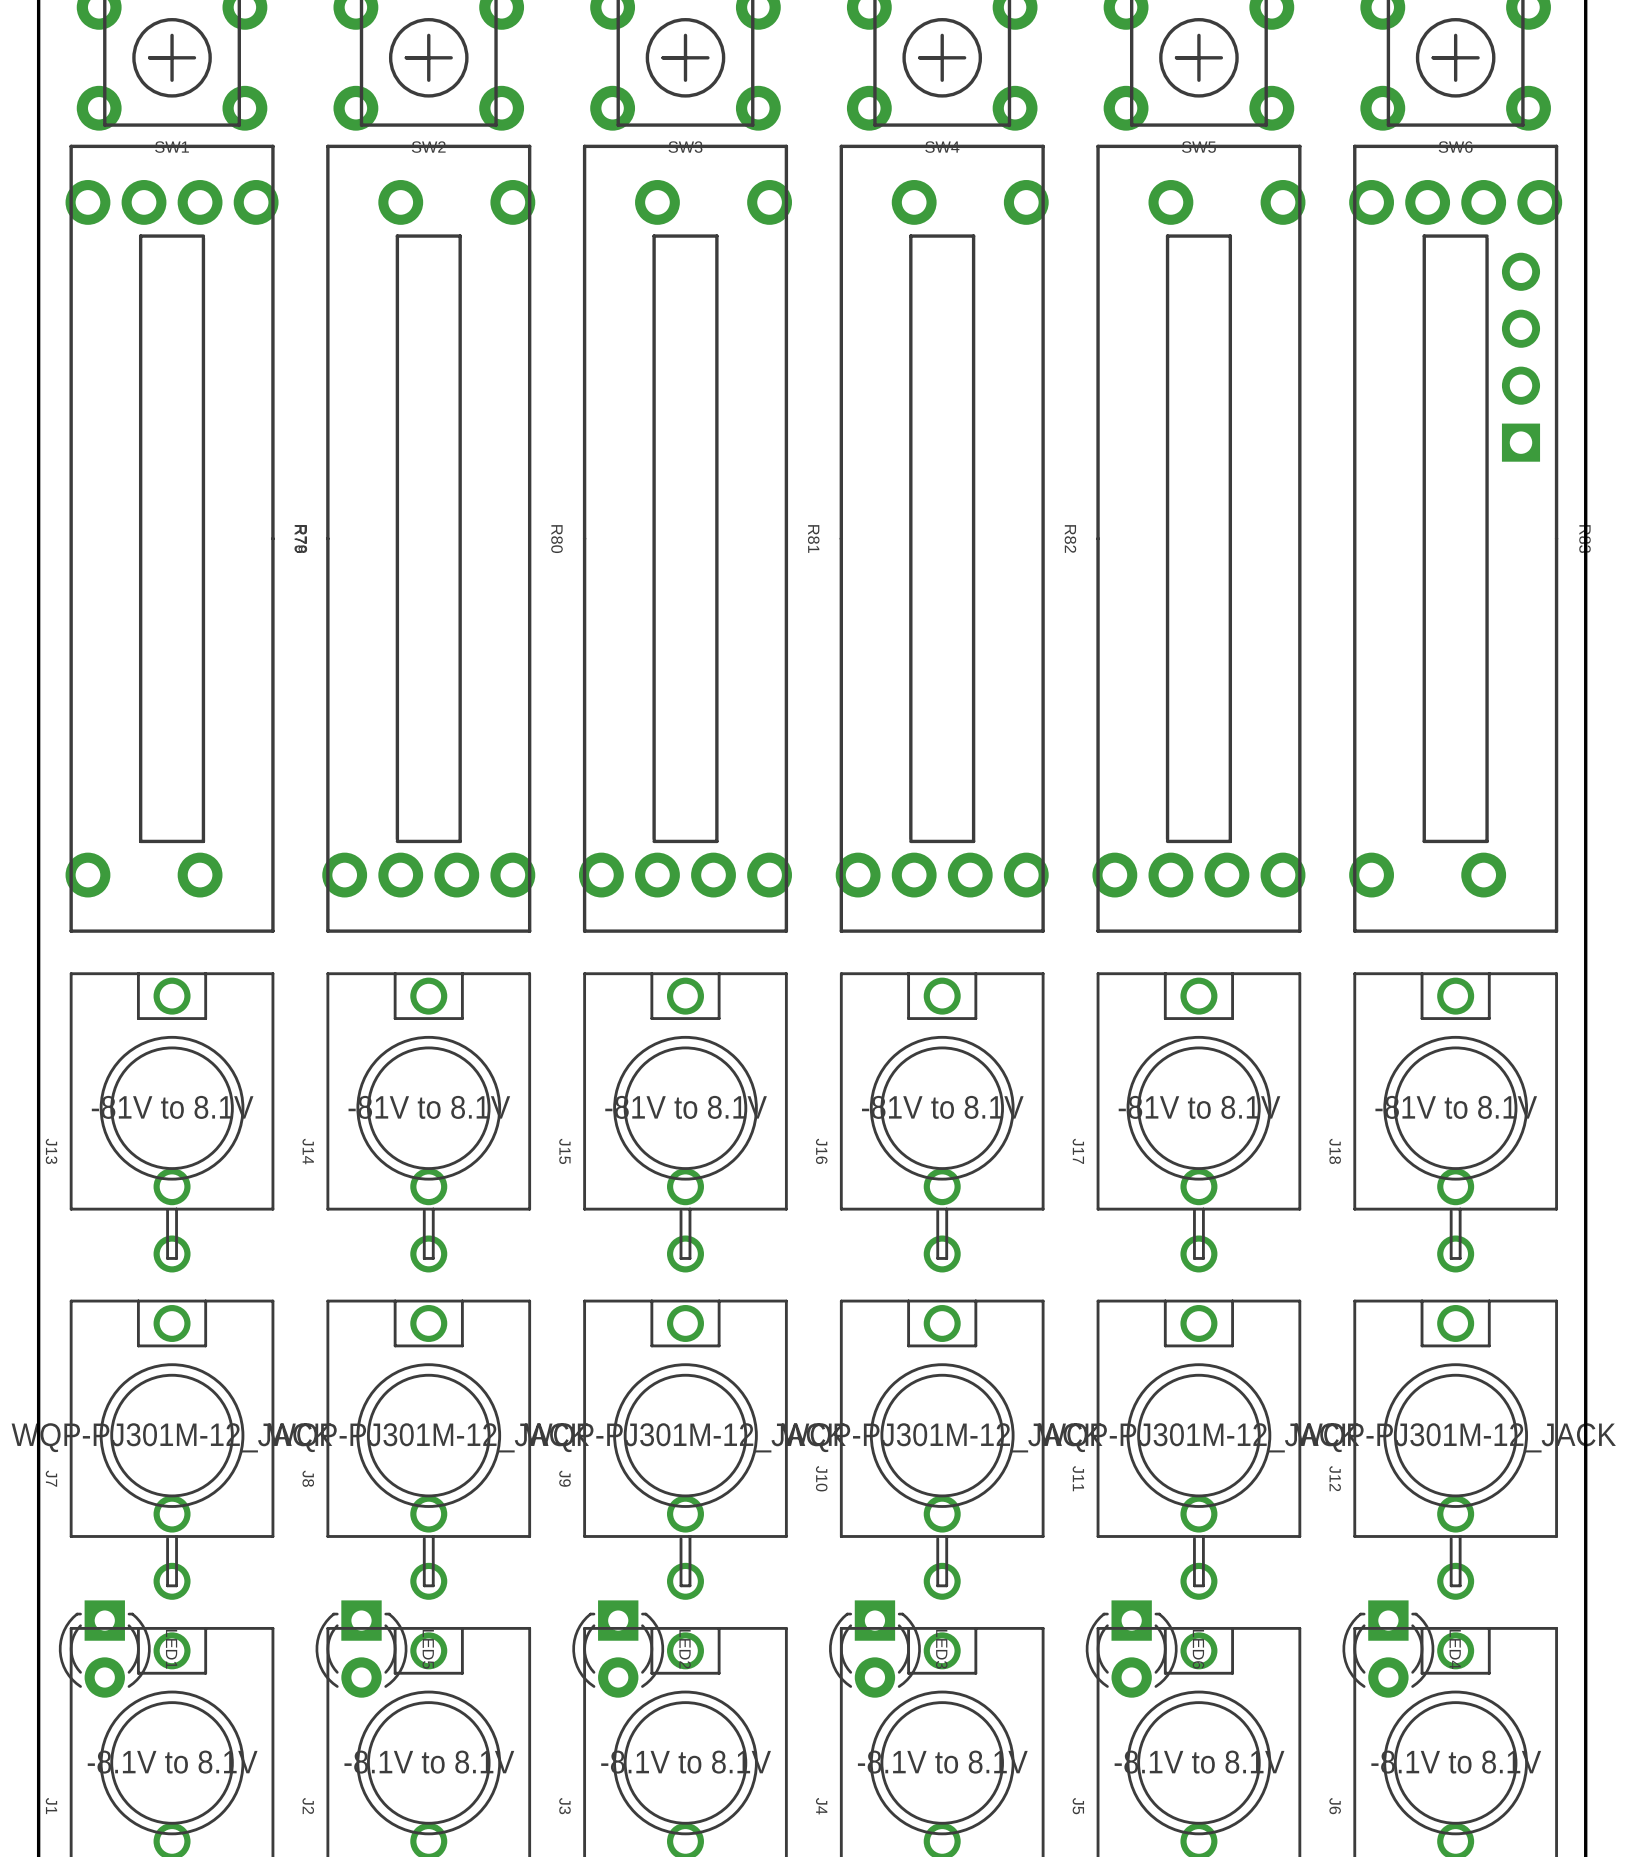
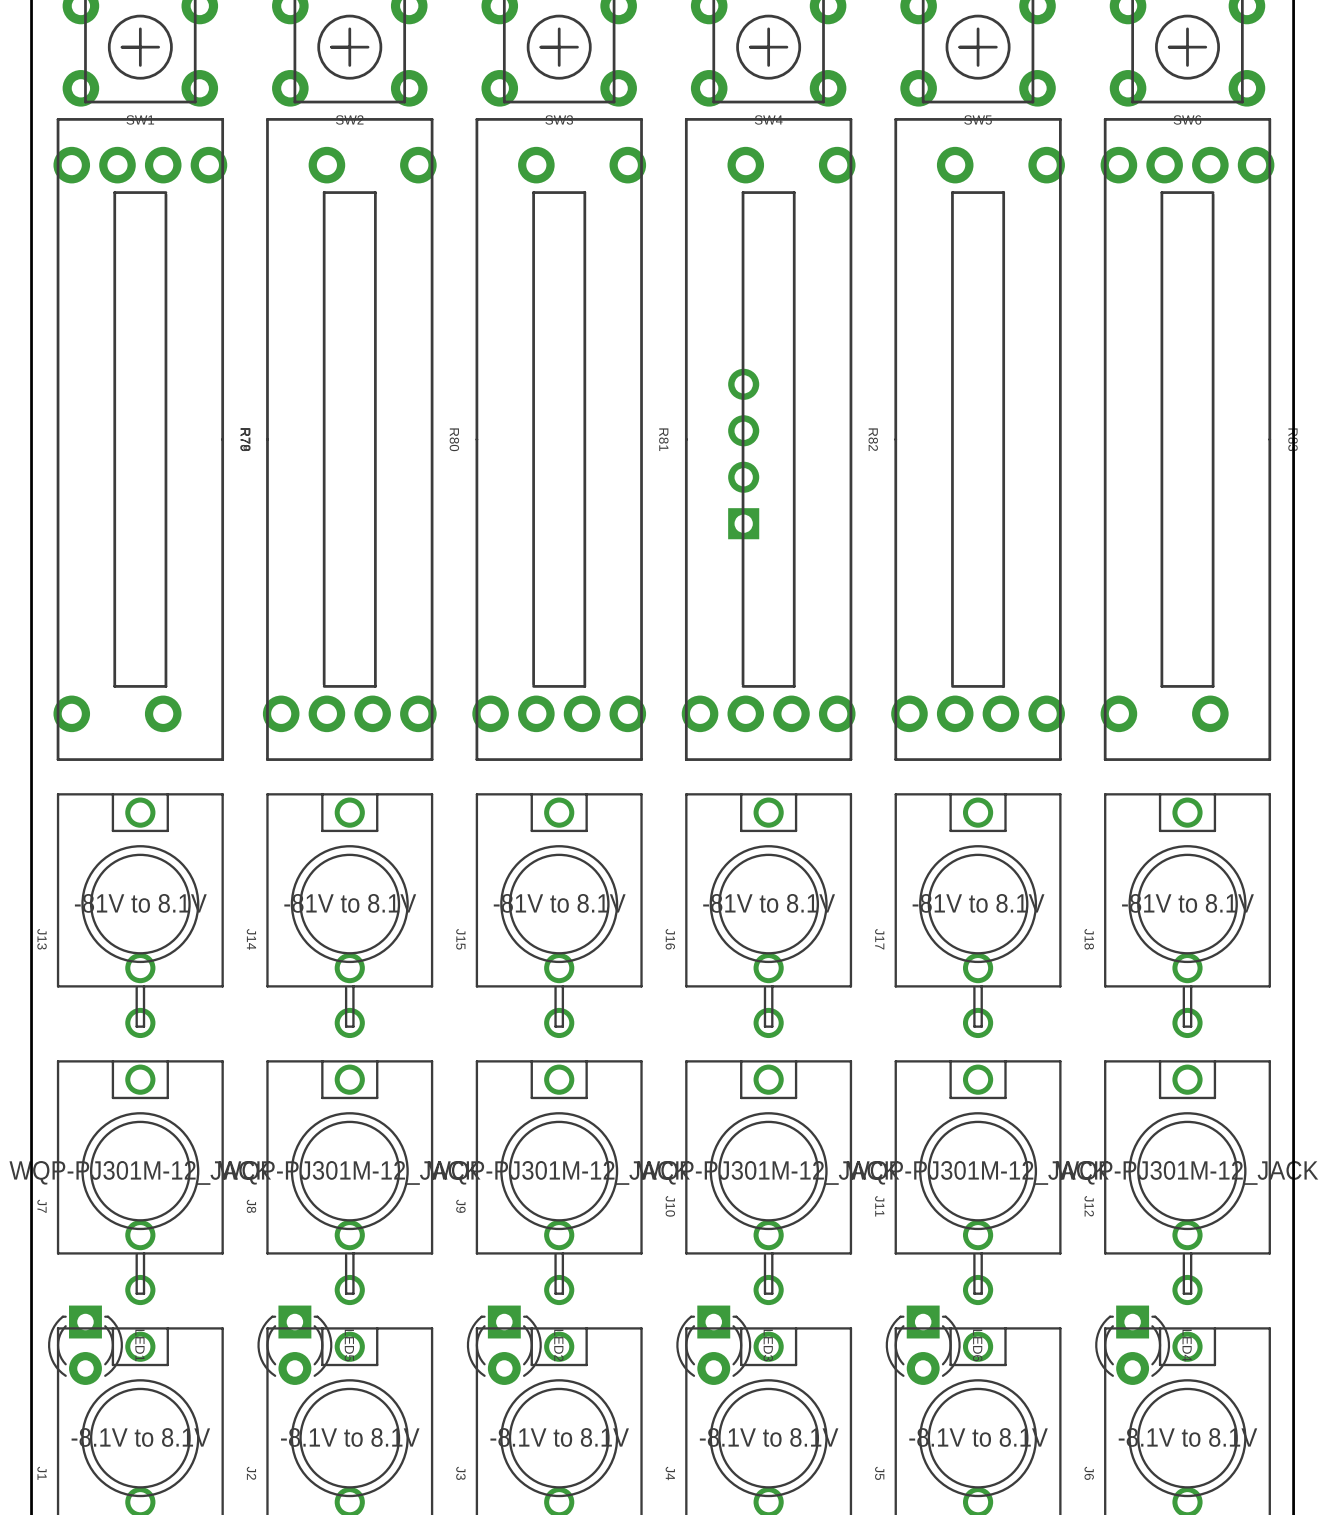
part: (1520, 357) -> none
part: none -> (743, 454)

